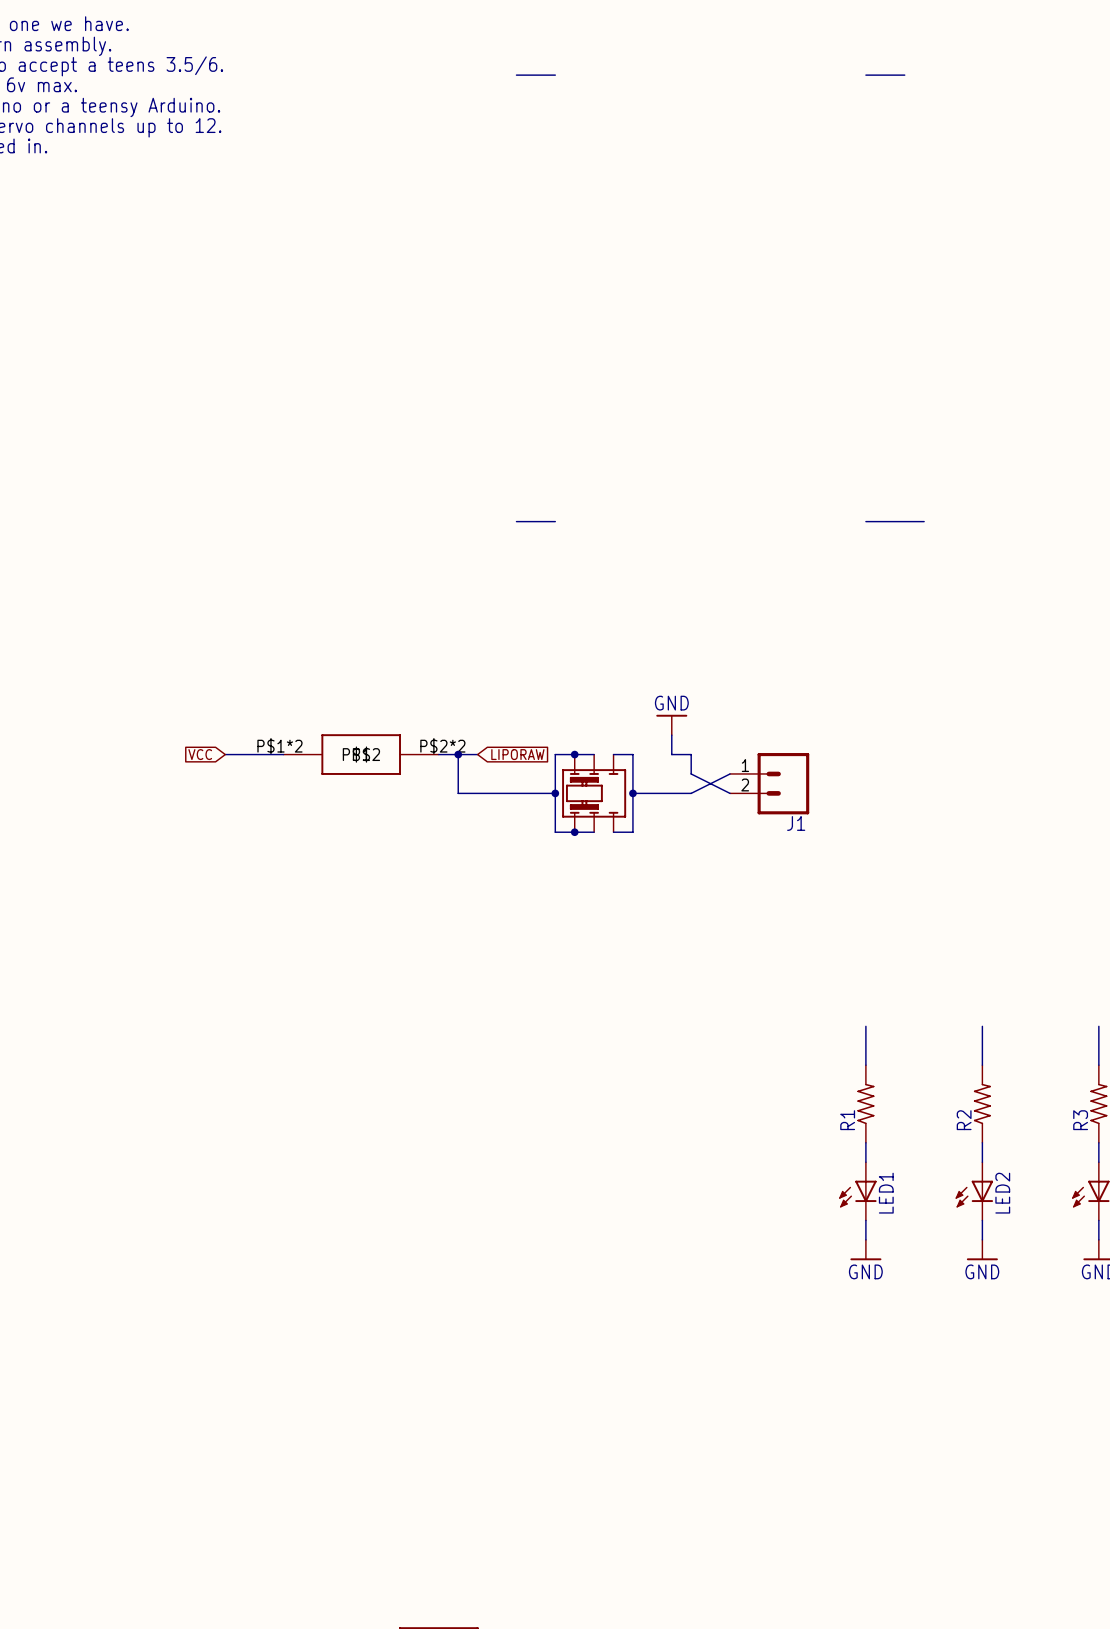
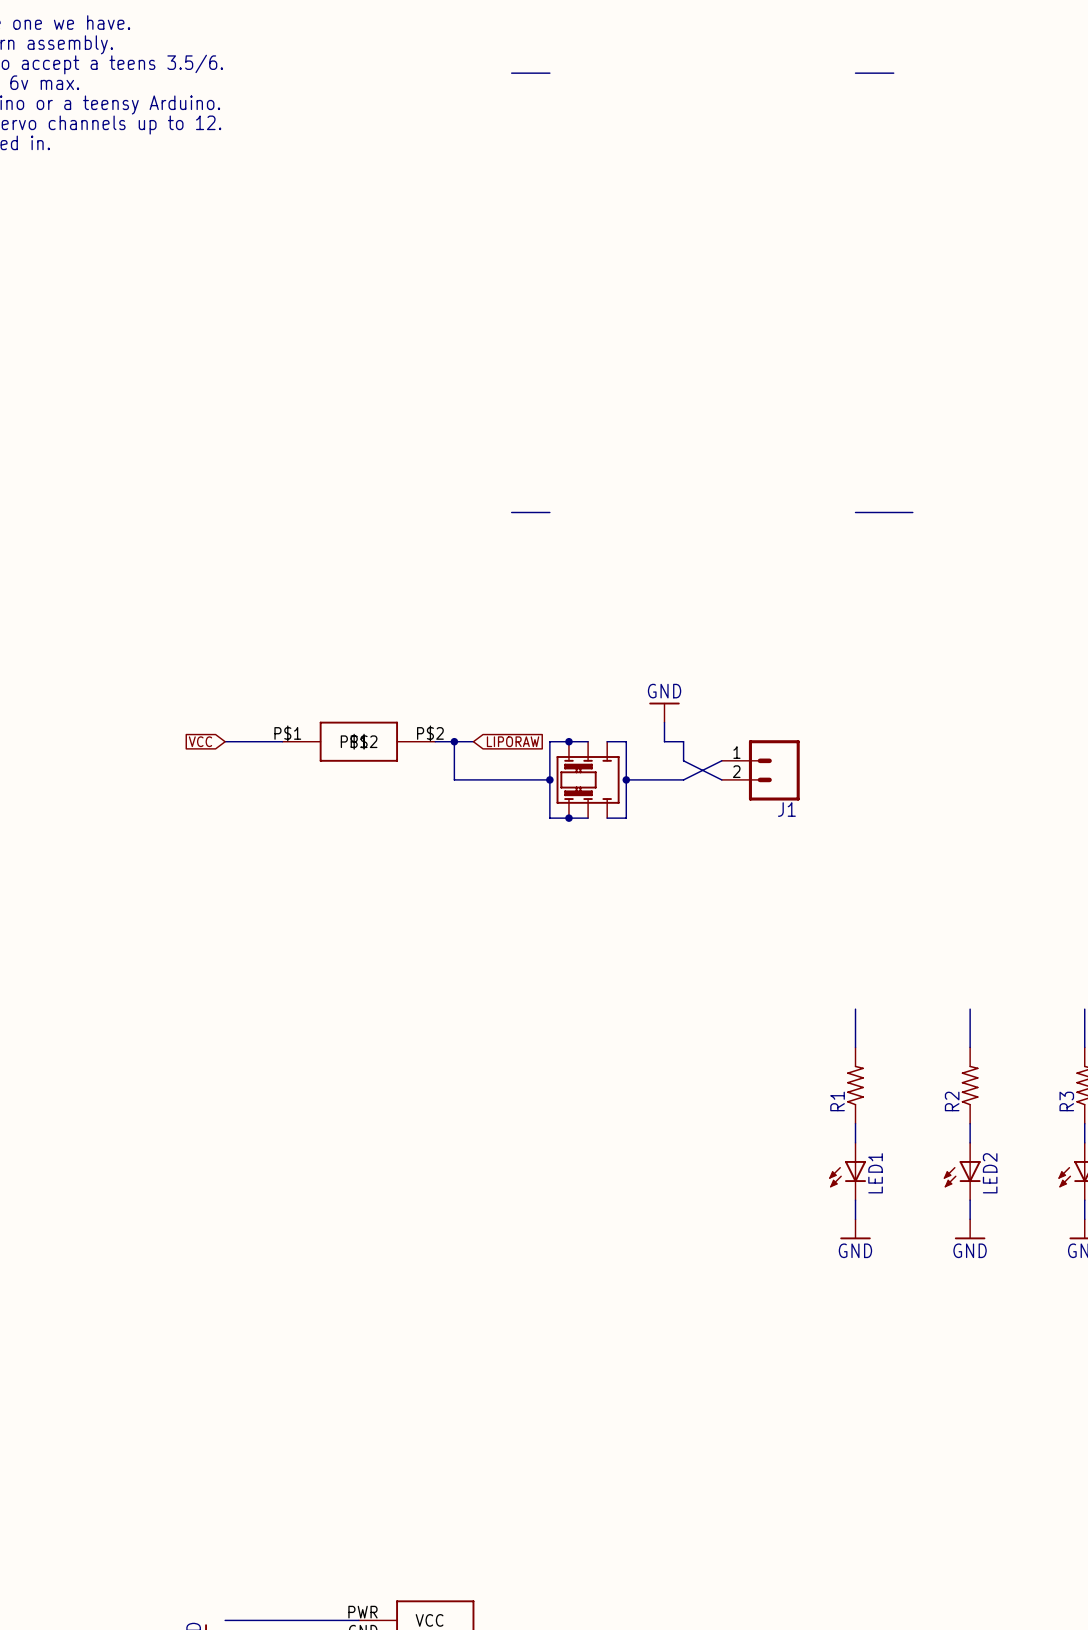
part pin number: P$1*2 (279, 746) -> P$1 (287, 733)
part pin number: P$2*2 (442, 746) -> P$2 (430, 733)

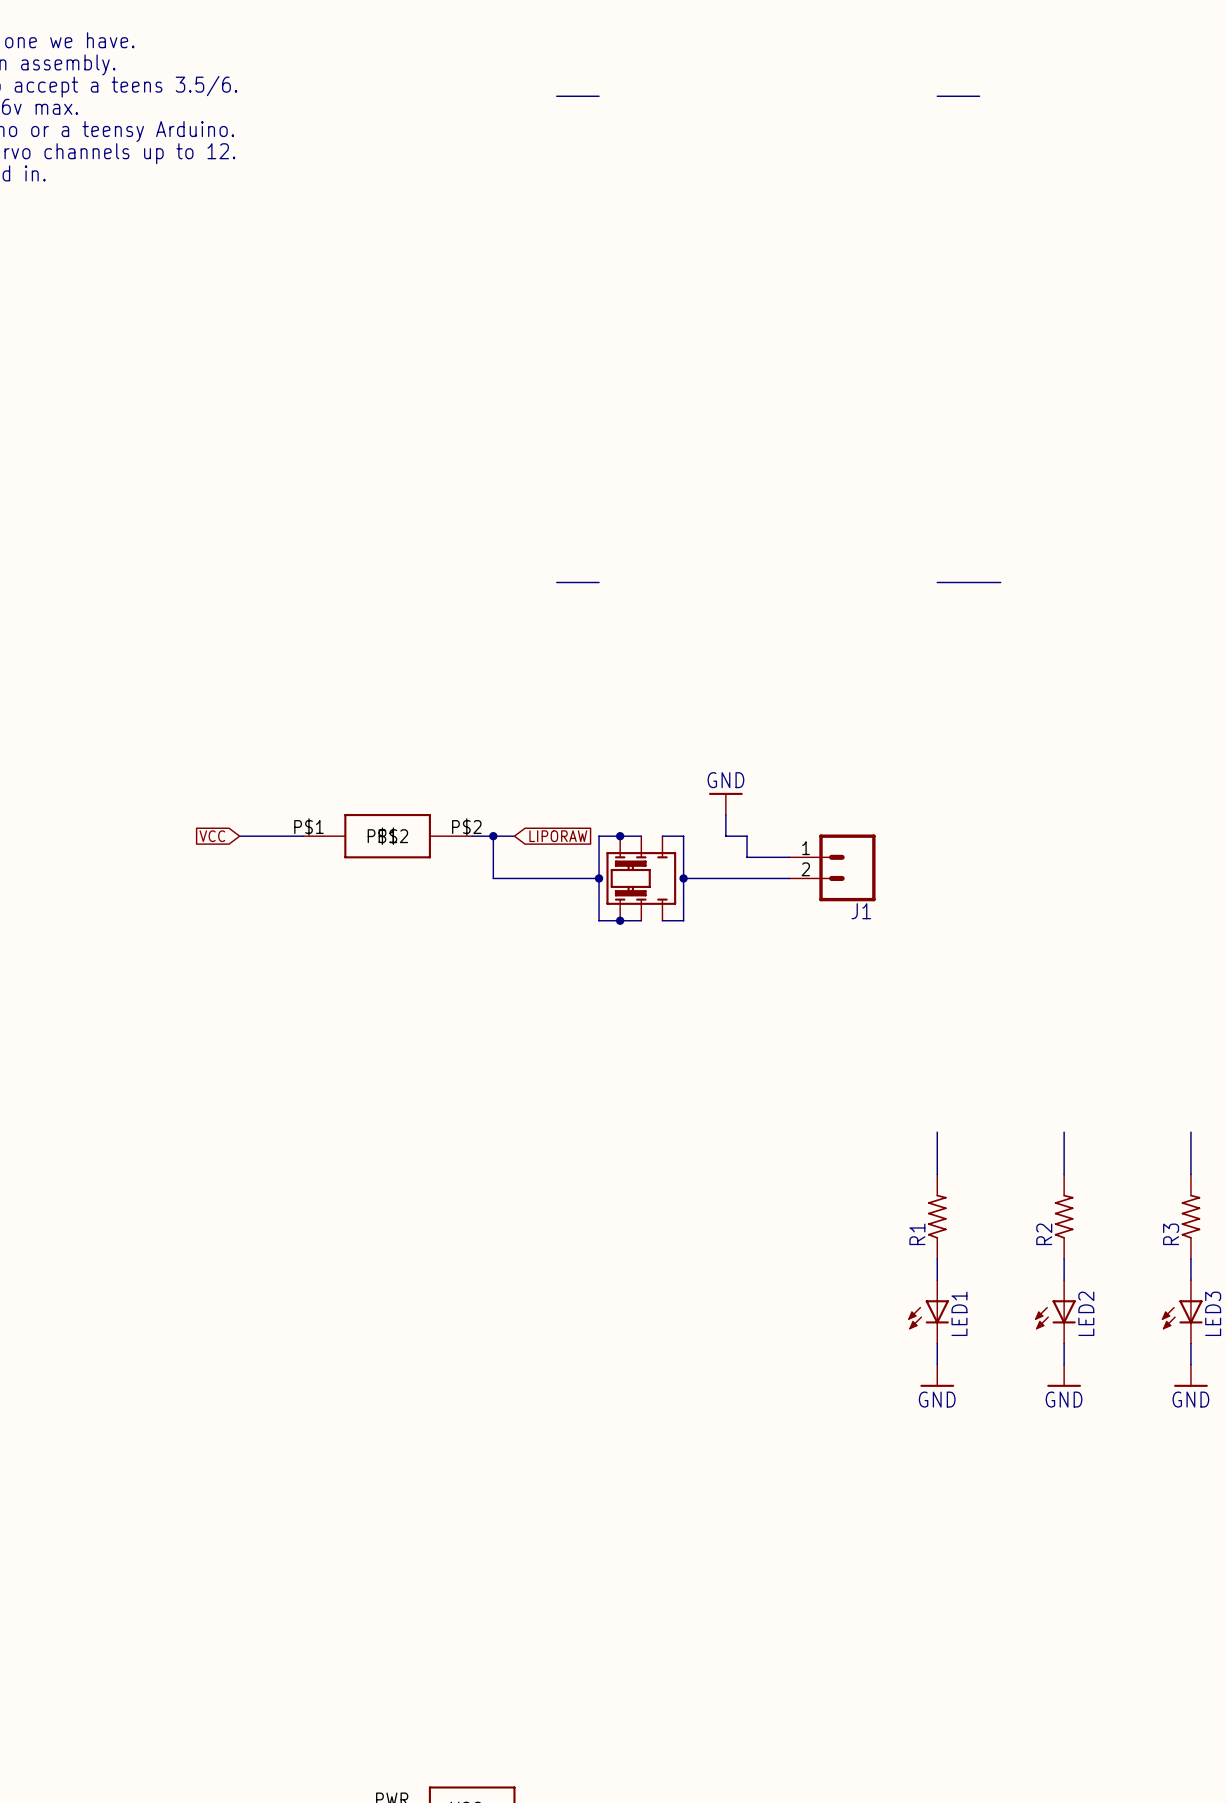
wire: (683, 760) (721, 779) -> (747, 857) (789, 857)
wire: (721, 760) (683, 779) -> (789, 878) (747, 878)

